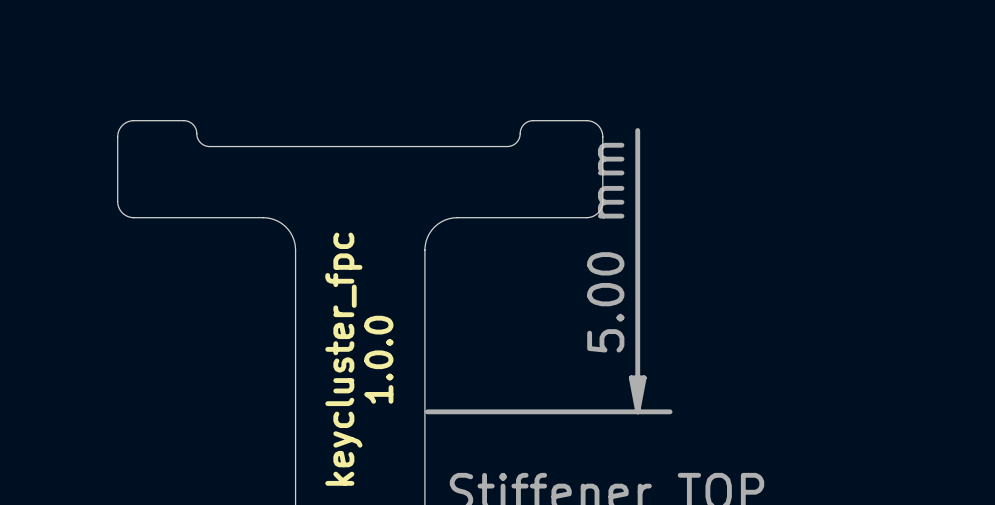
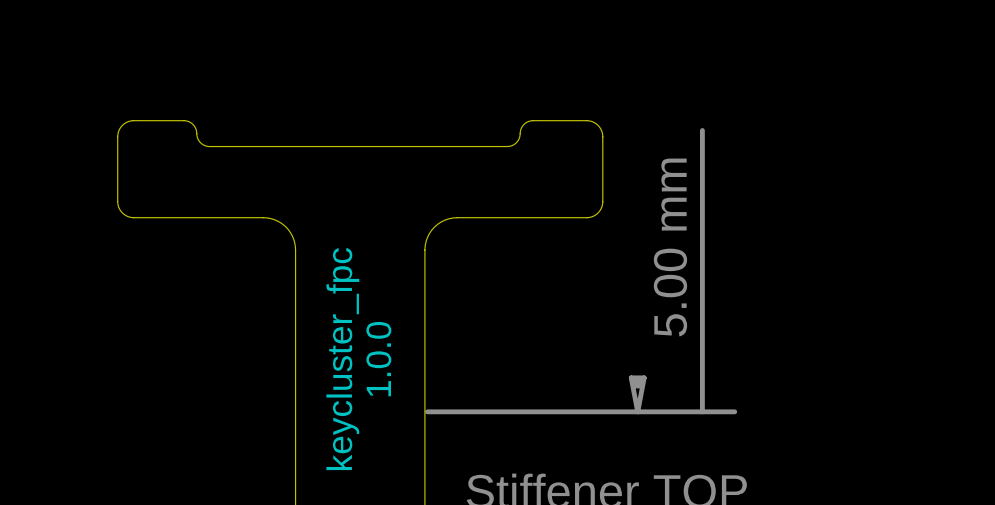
line: (637, 130) (637, 411) -> (702, 130) (702, 411)
text position: 5.00 mm (605, 247) -> 5.00 mm (670, 247)
line: none -> (670, 411) (734, 411)

